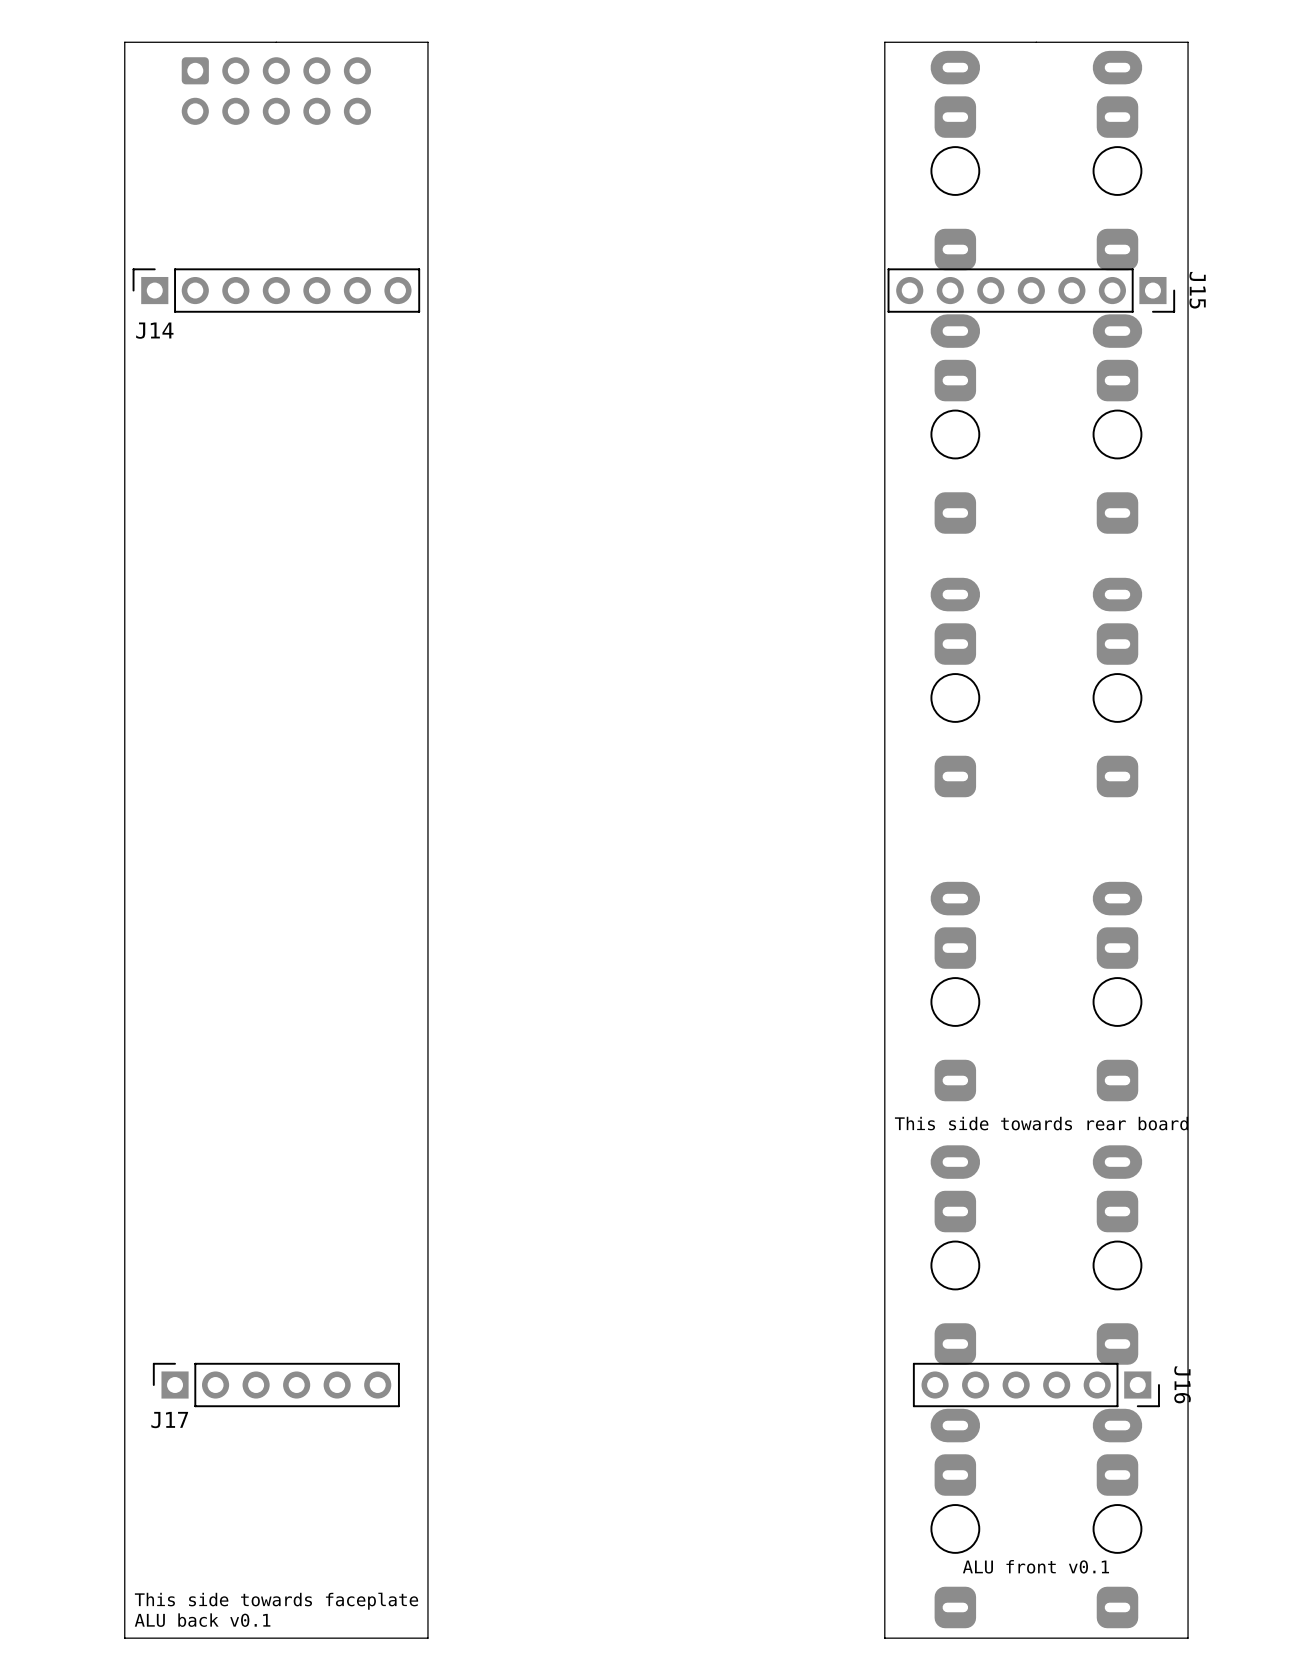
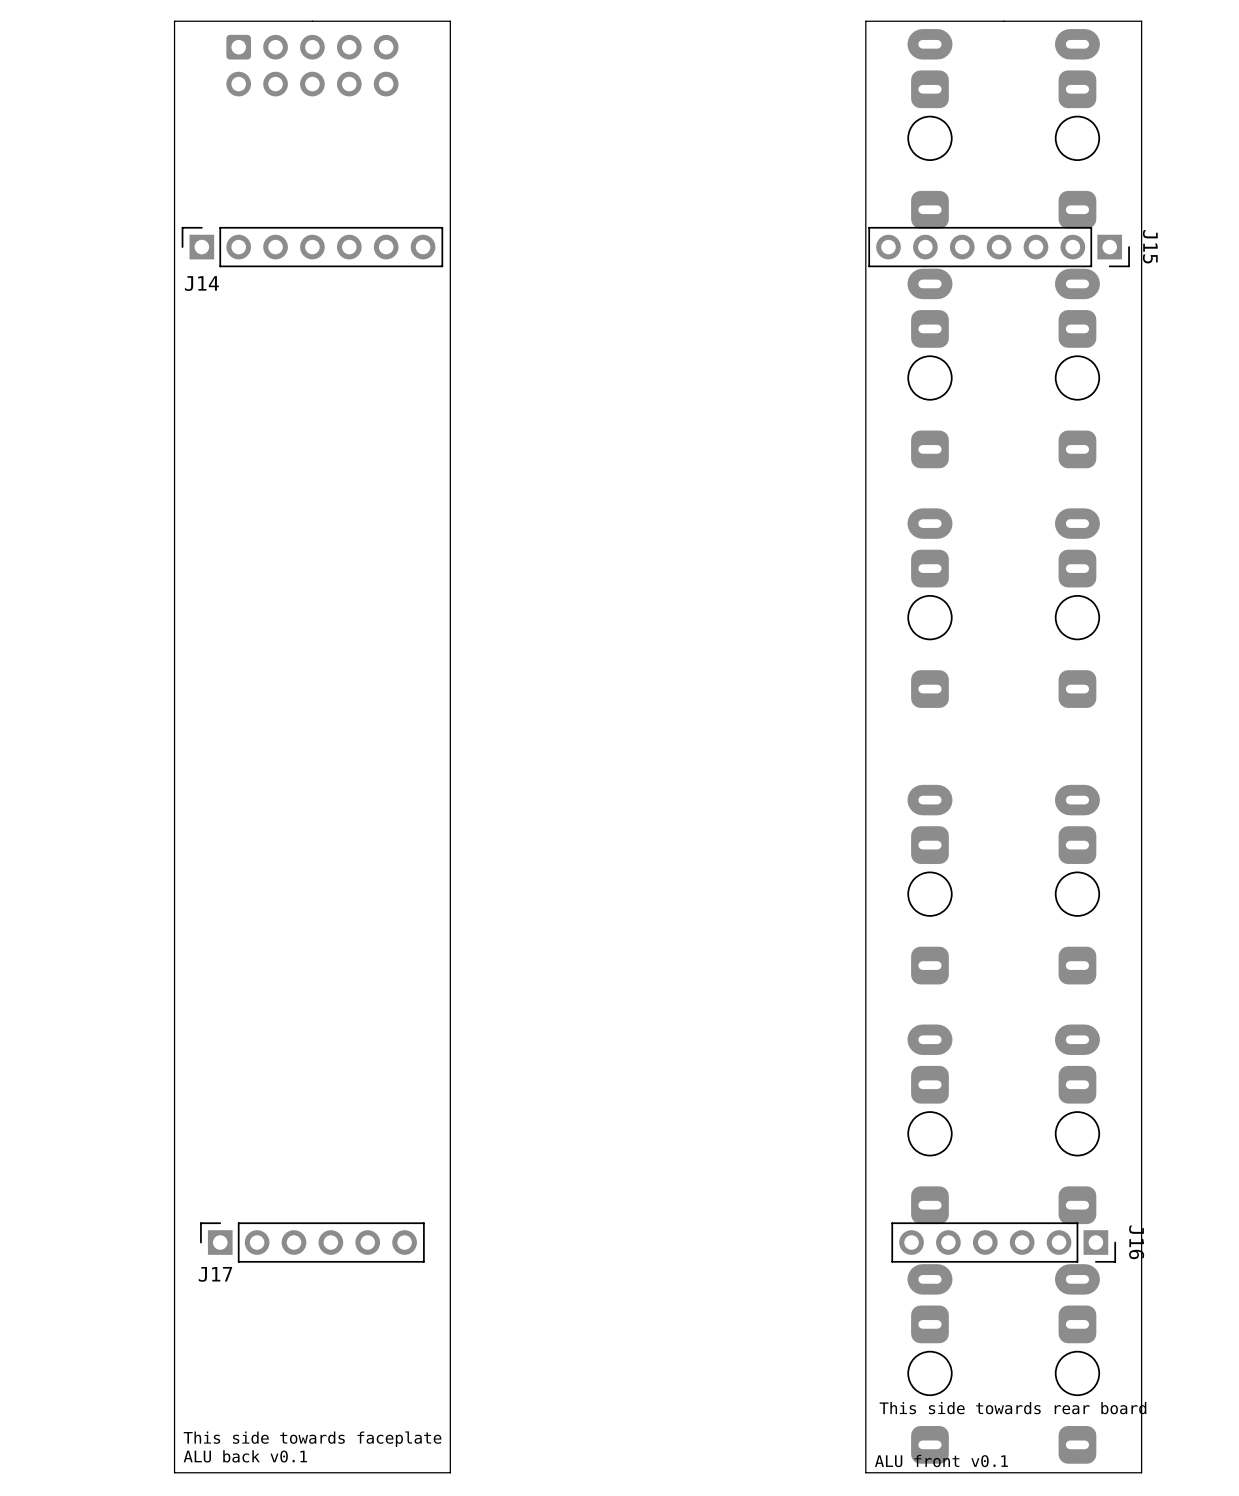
text: This side towards rear board (1041, 1123) -> none
text position: ALU front v0.1 (1035, 1566) -> ALU front v0.1 (941, 1460)
text: none -> This side towards rear board (1012, 1408)

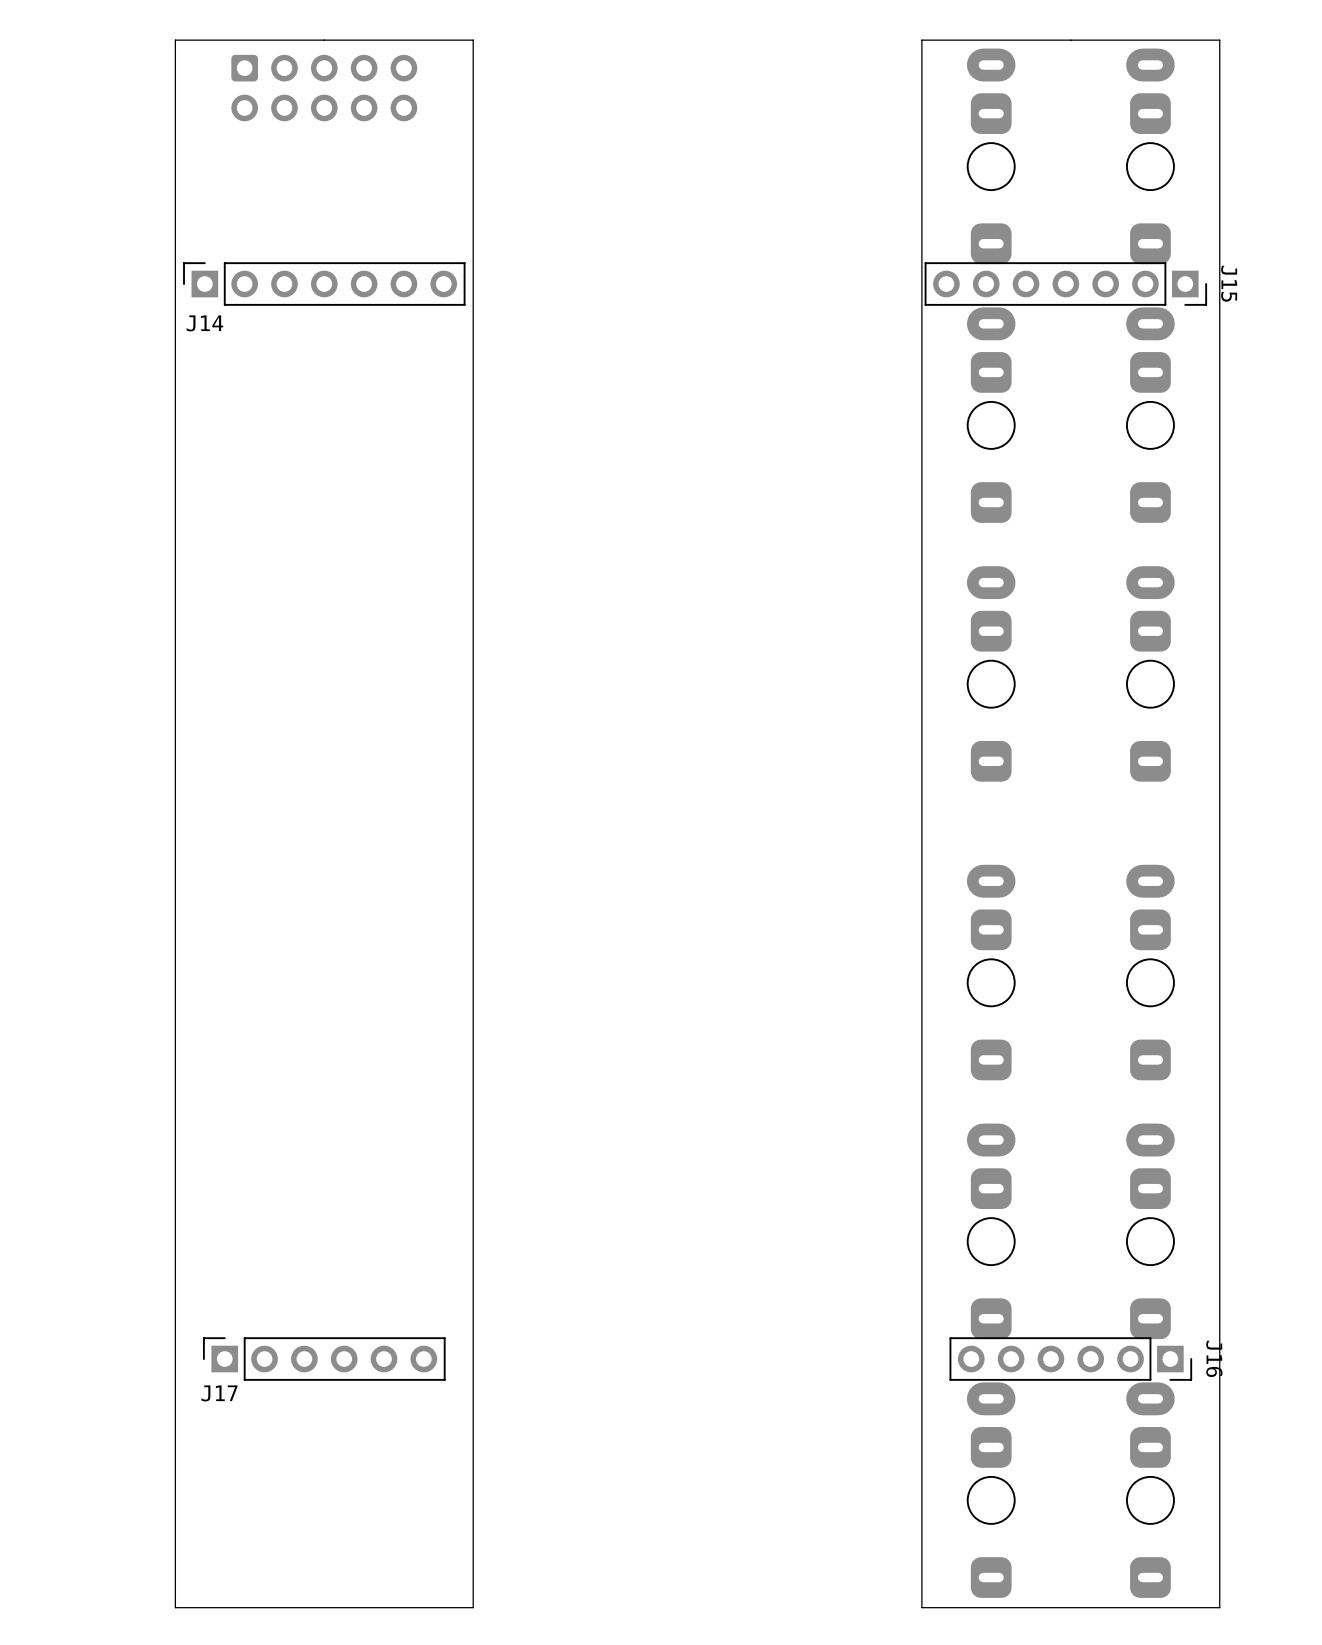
text: This side towards rear board (1012, 1408) -> none
text: This side towards faceplate (312, 1439) -> none
text: ALU back v0.1 (245, 1456) -> none
text: ALU front v0.1 (941, 1460) -> none

